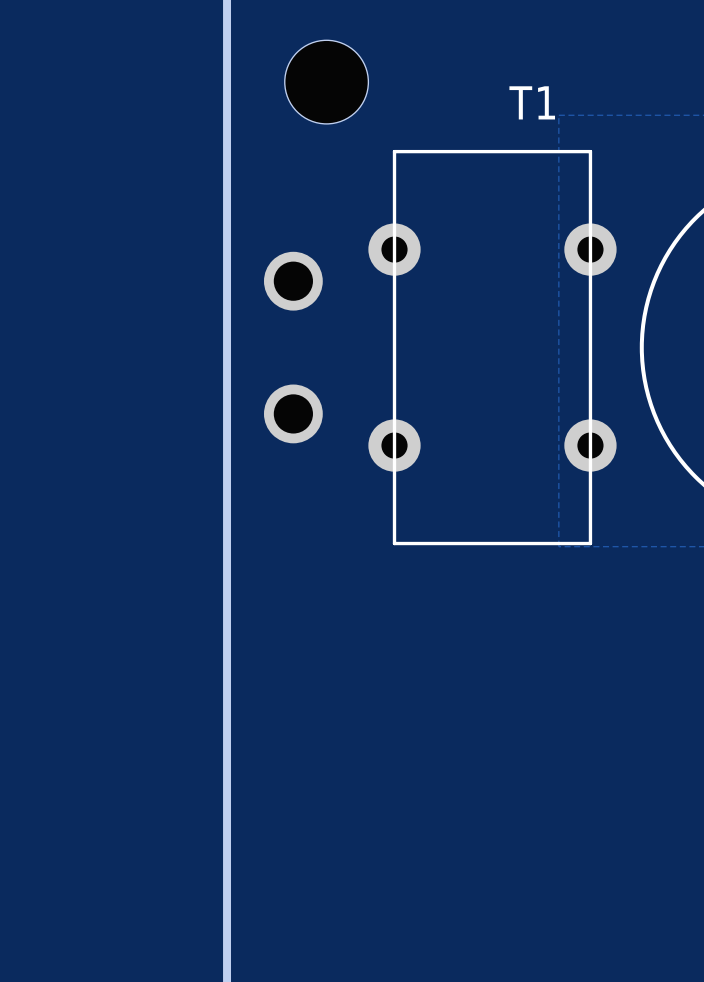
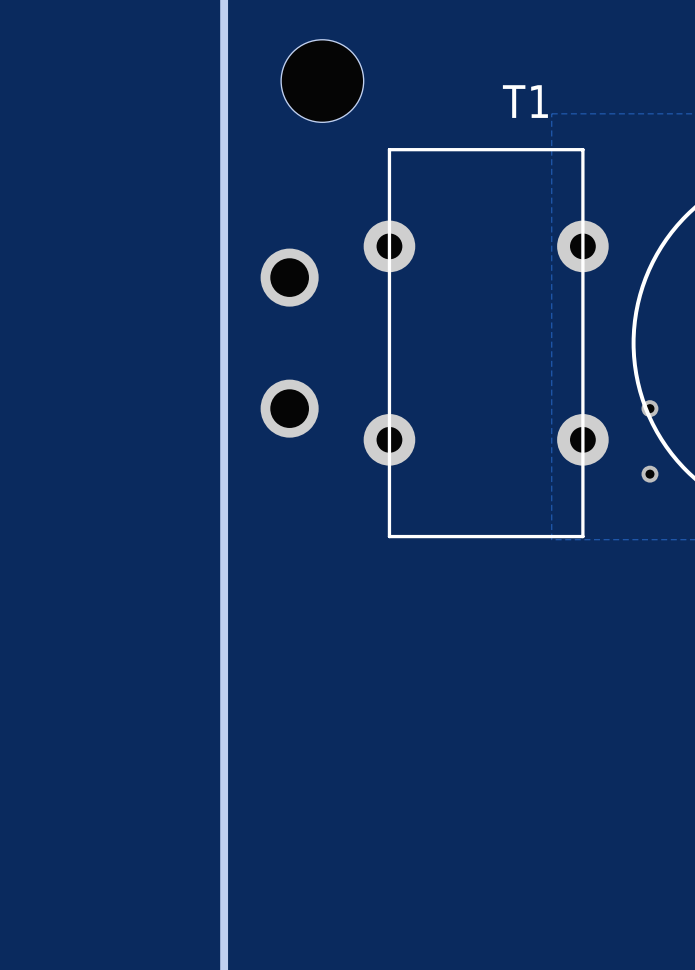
via: none -> (649, 408)
via: none -> (649, 474)

